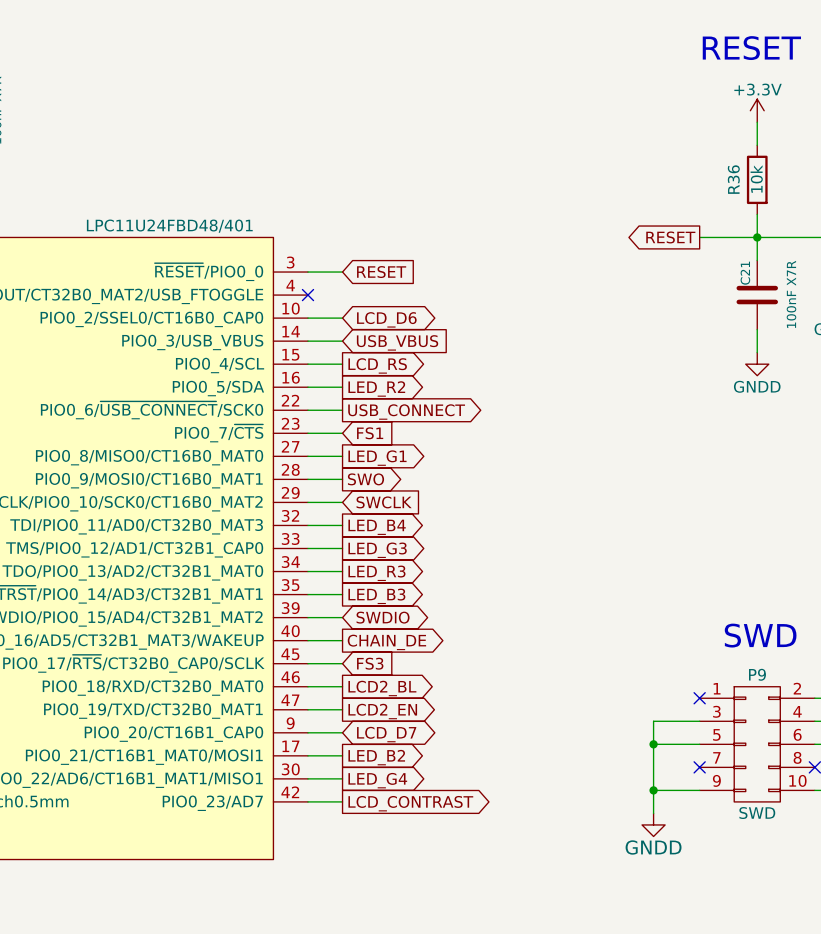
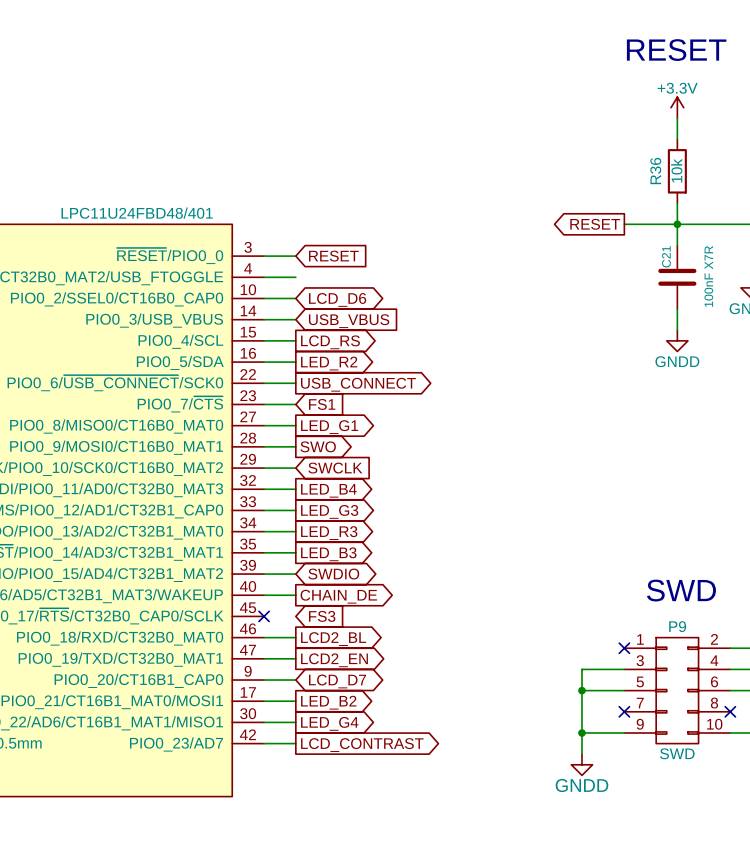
wire: none -> (264, 277) (295, 277)
no-connect mark: (307, 295) -> none
wire: (307, 663) (342, 663) -> none
no-connect mark: none -> (264, 616)

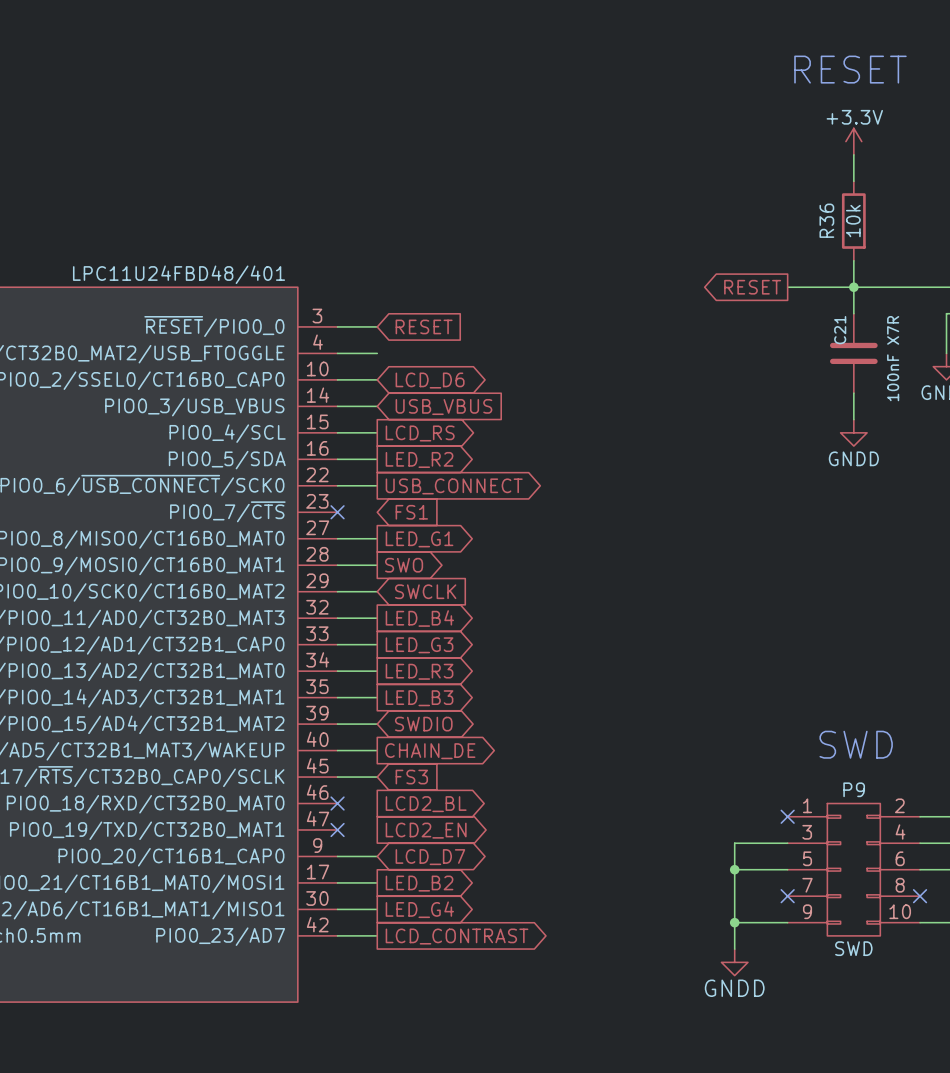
wire: (264, 404) (295, 404) -> none
no-connect mark: none -> (337, 512)
no-connect mark: (264, 616) -> none
wire: (264, 637) (295, 637) -> (337, 777) (377, 777)
no-connect mark: none -> (337, 803)
wire: (264, 658) (295, 658) -> none
no-connect mark: none -> (337, 829)

